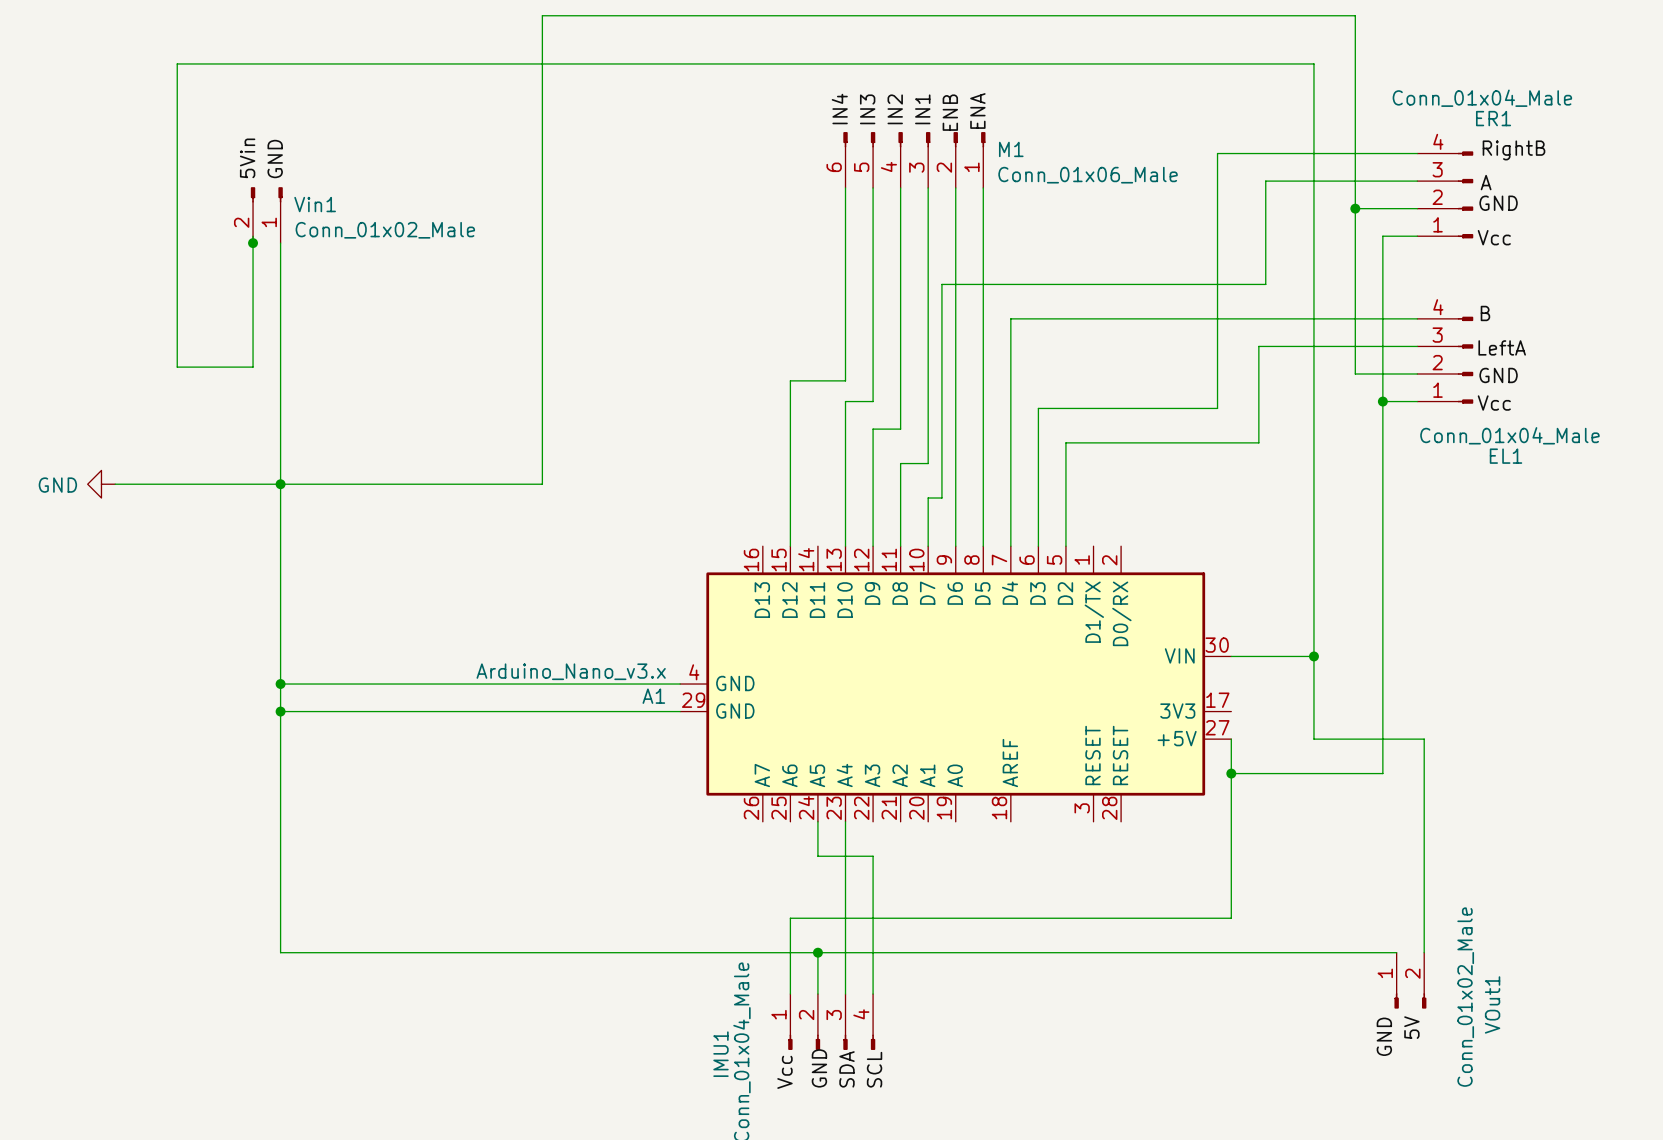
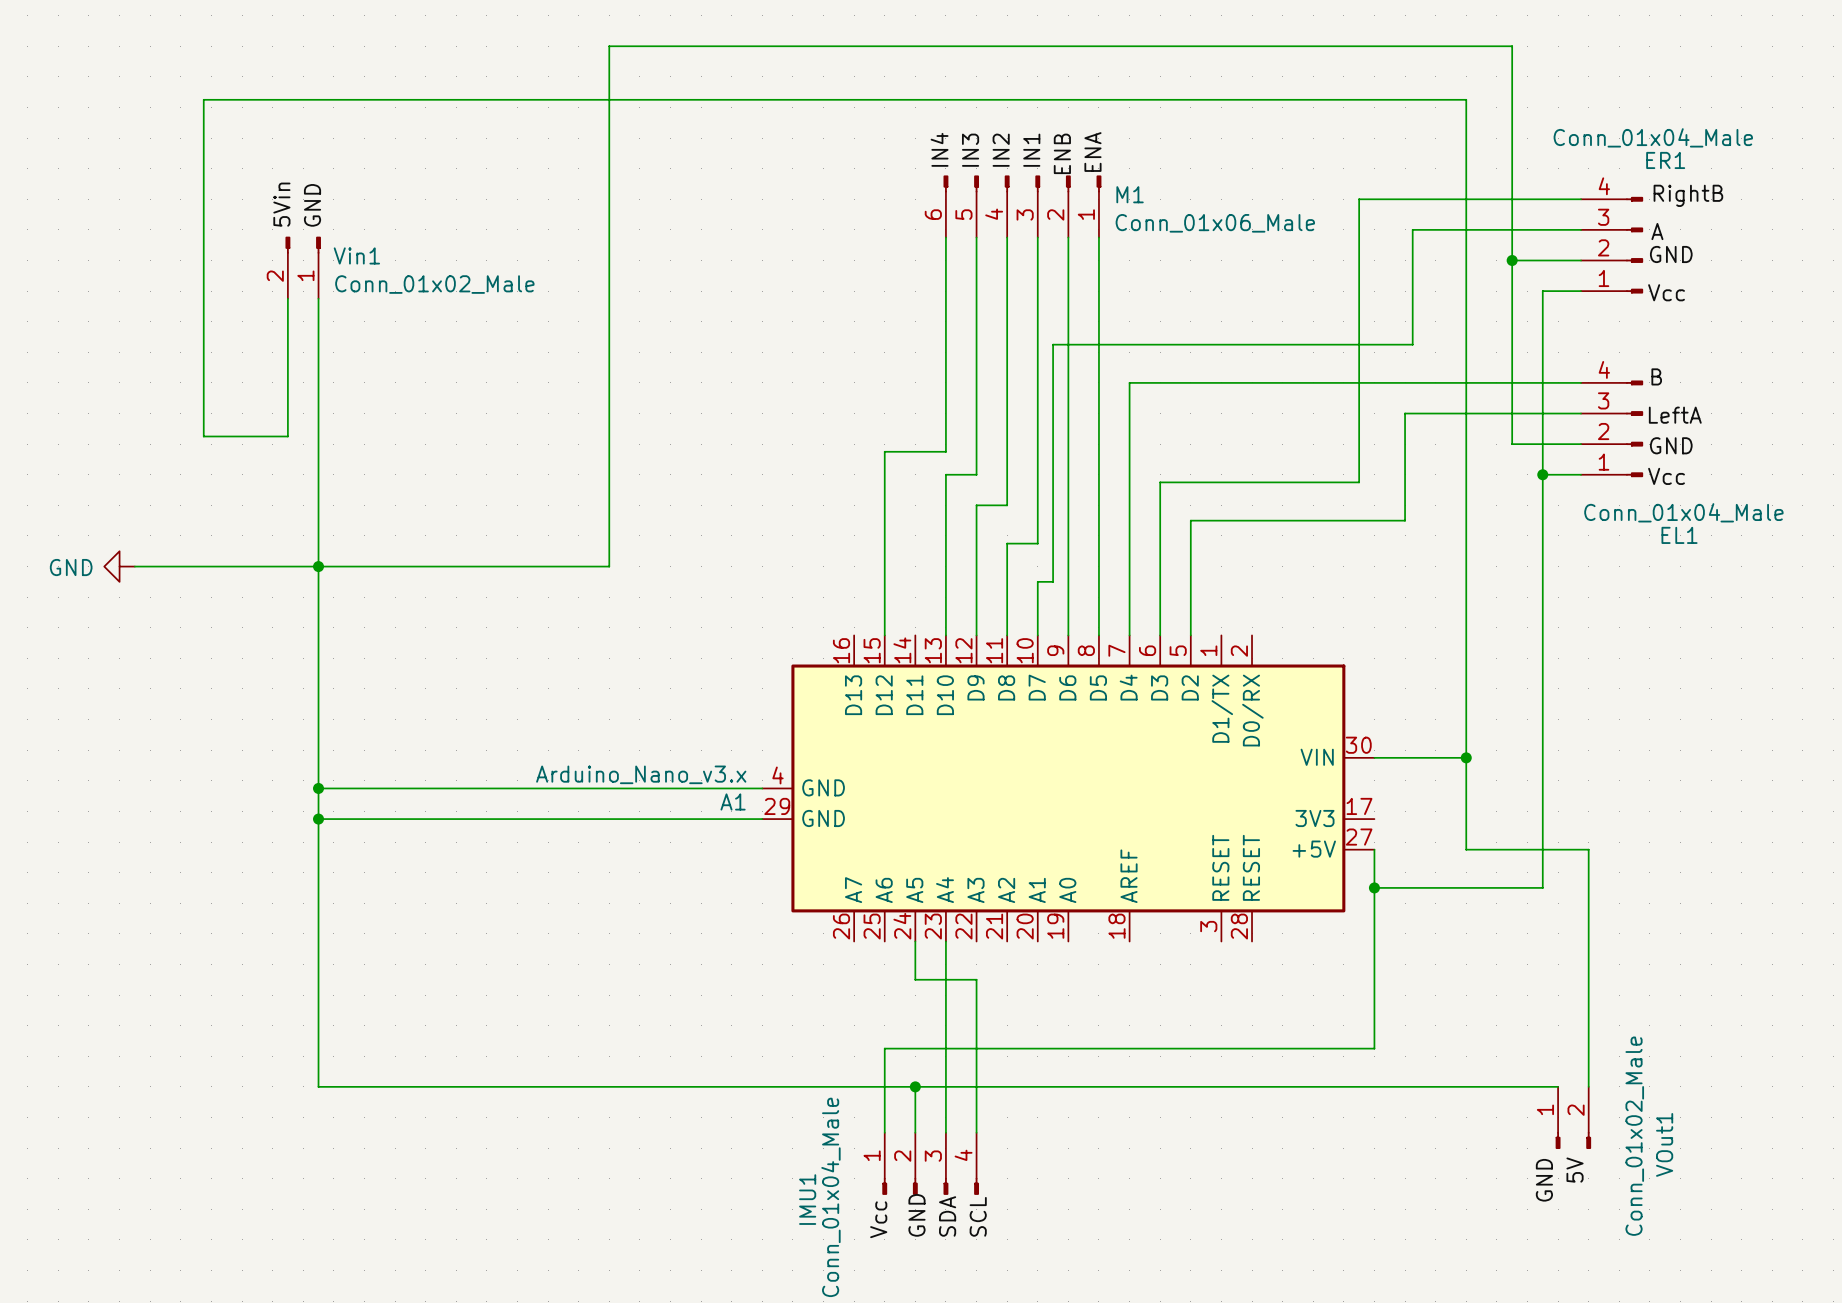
junction: (253, 243) -> none

